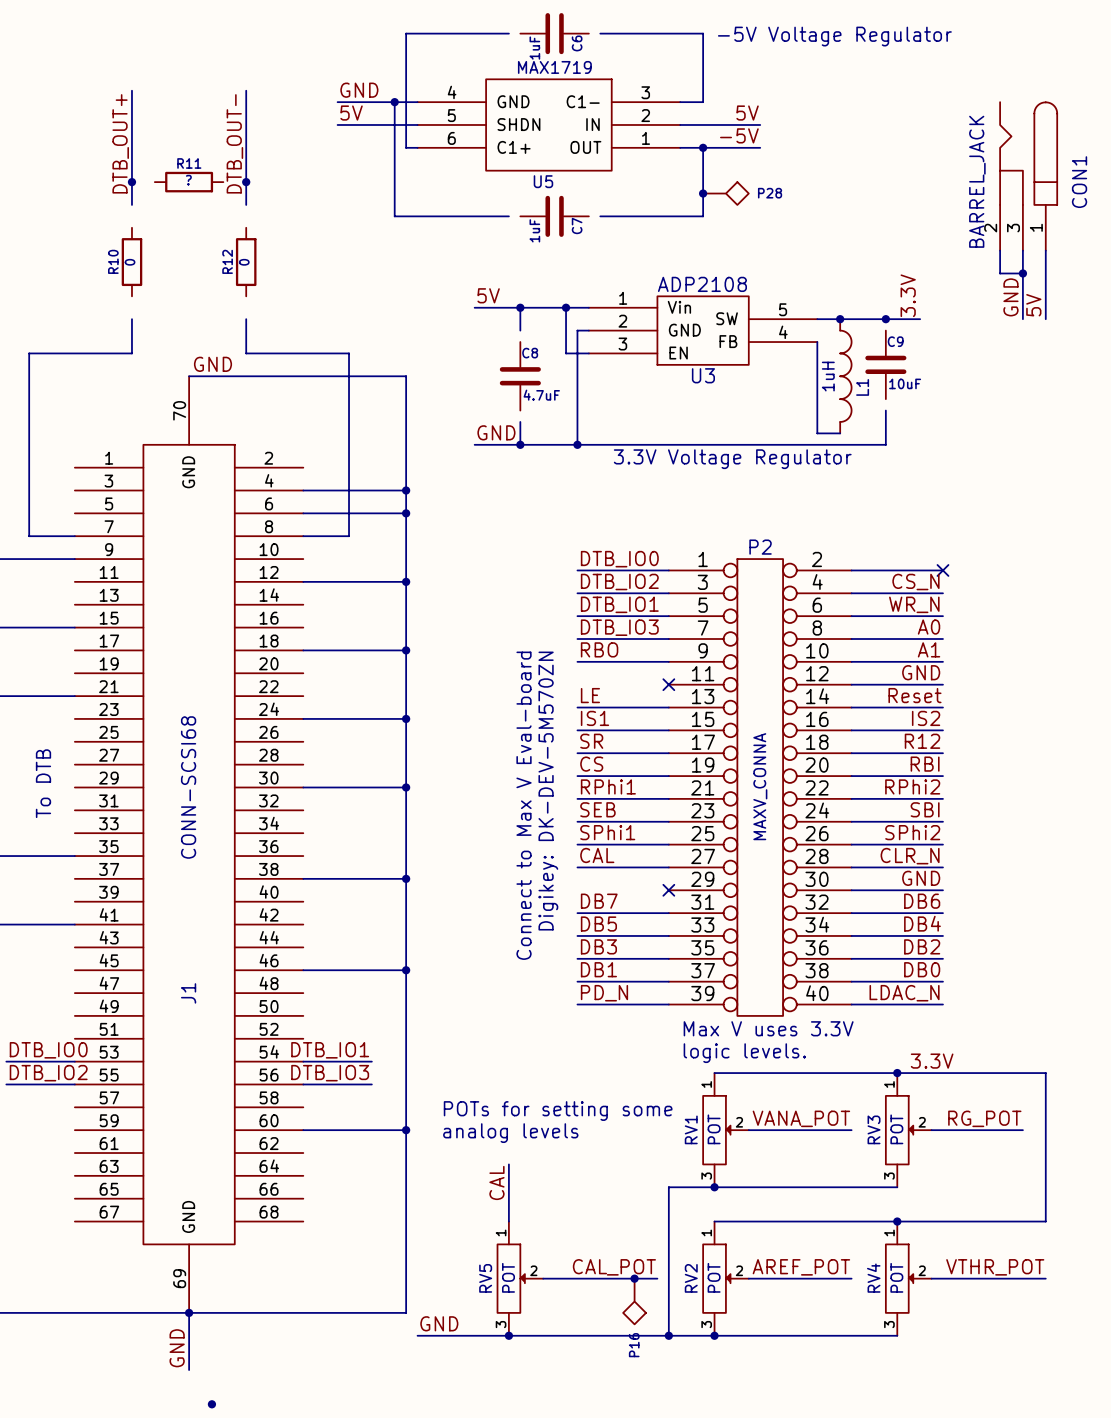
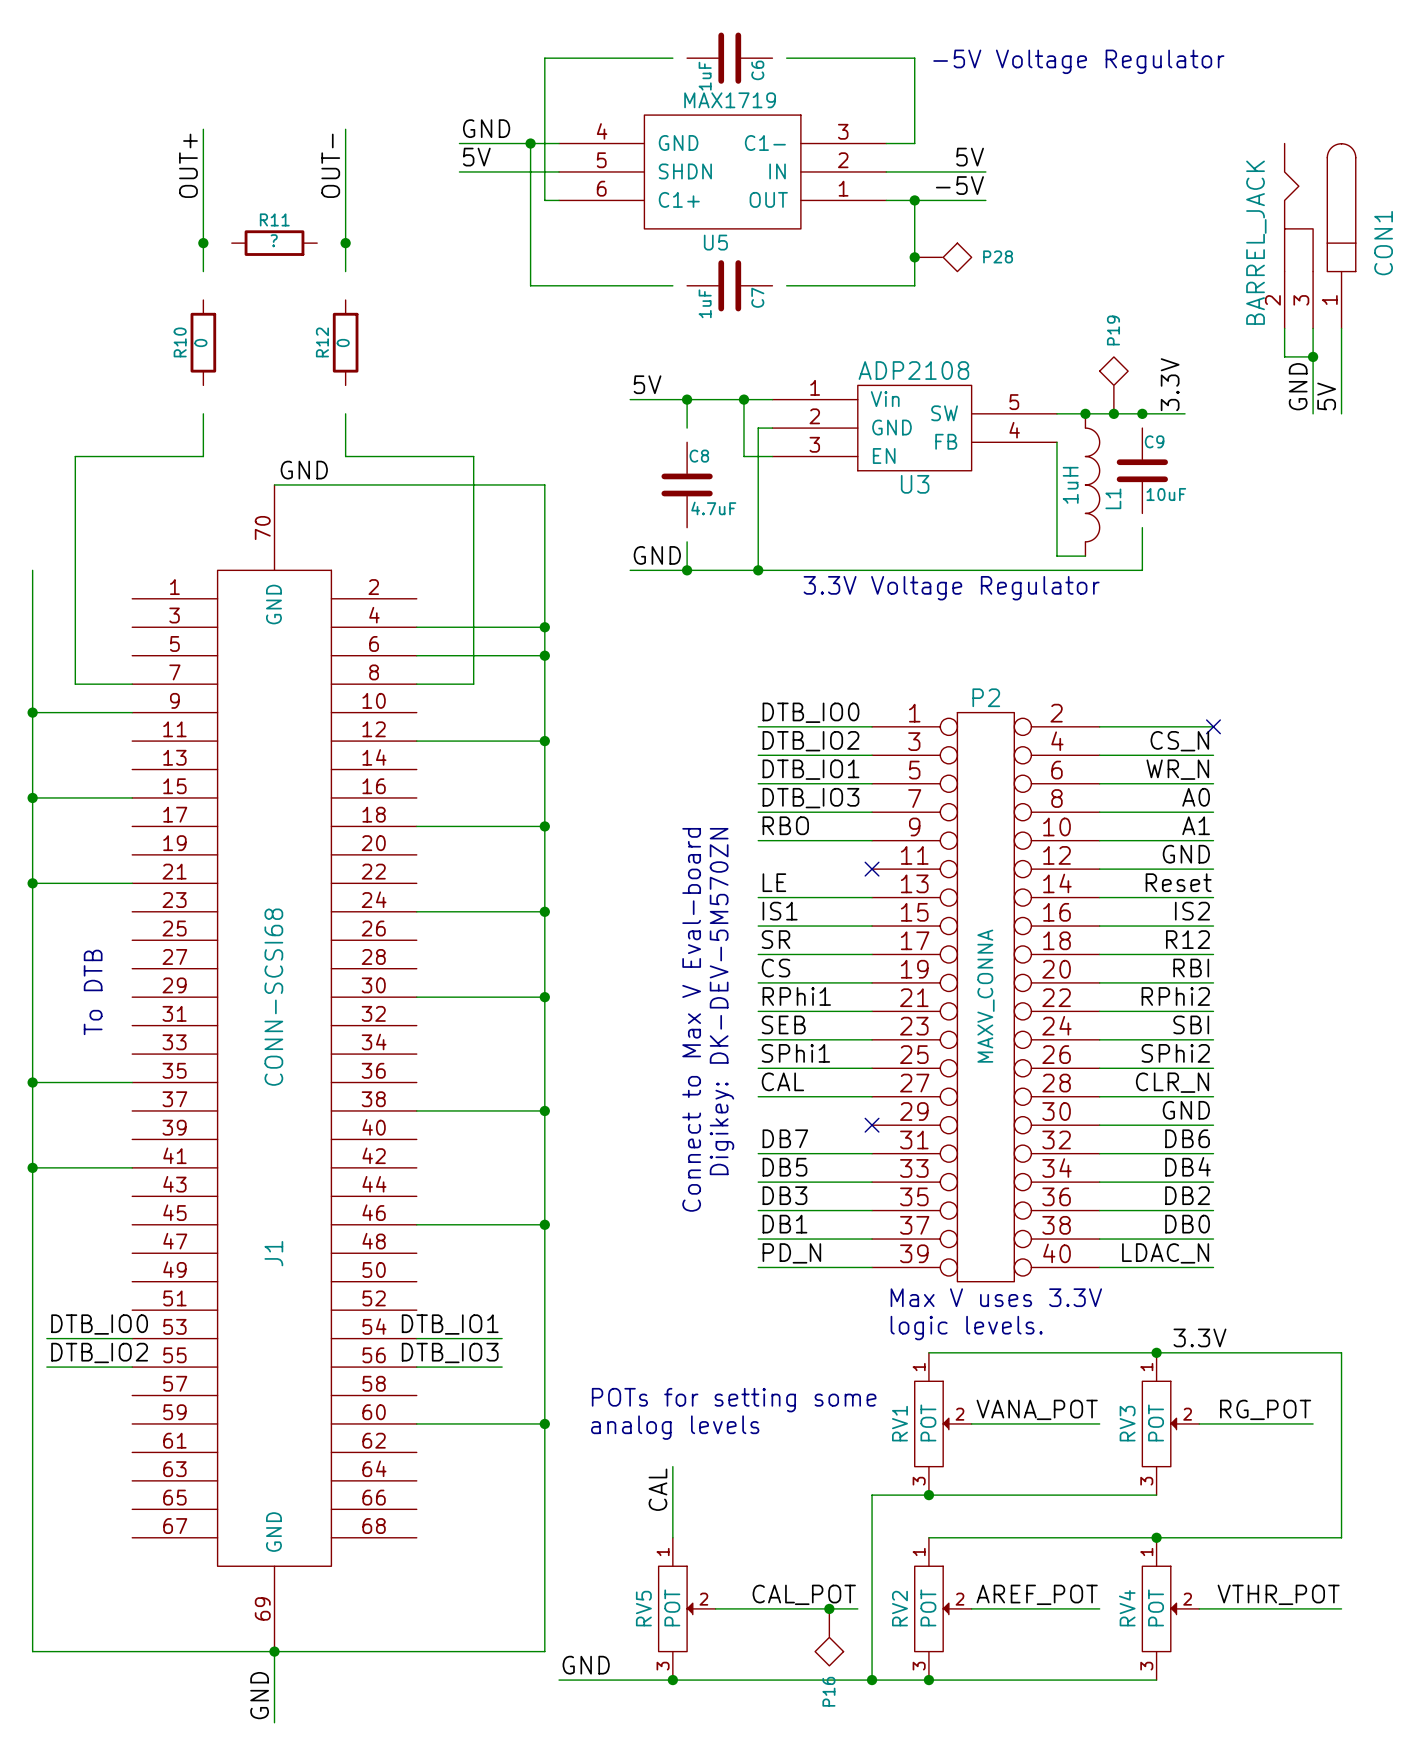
label: DTB_OUT+ (120, 143) -> OUT+ (188, 165)
label: DTB_OUT- (234, 143) -> OUT- (330, 165)
P19: none -> (1113, 385)
junction: none -> (1113, 413)

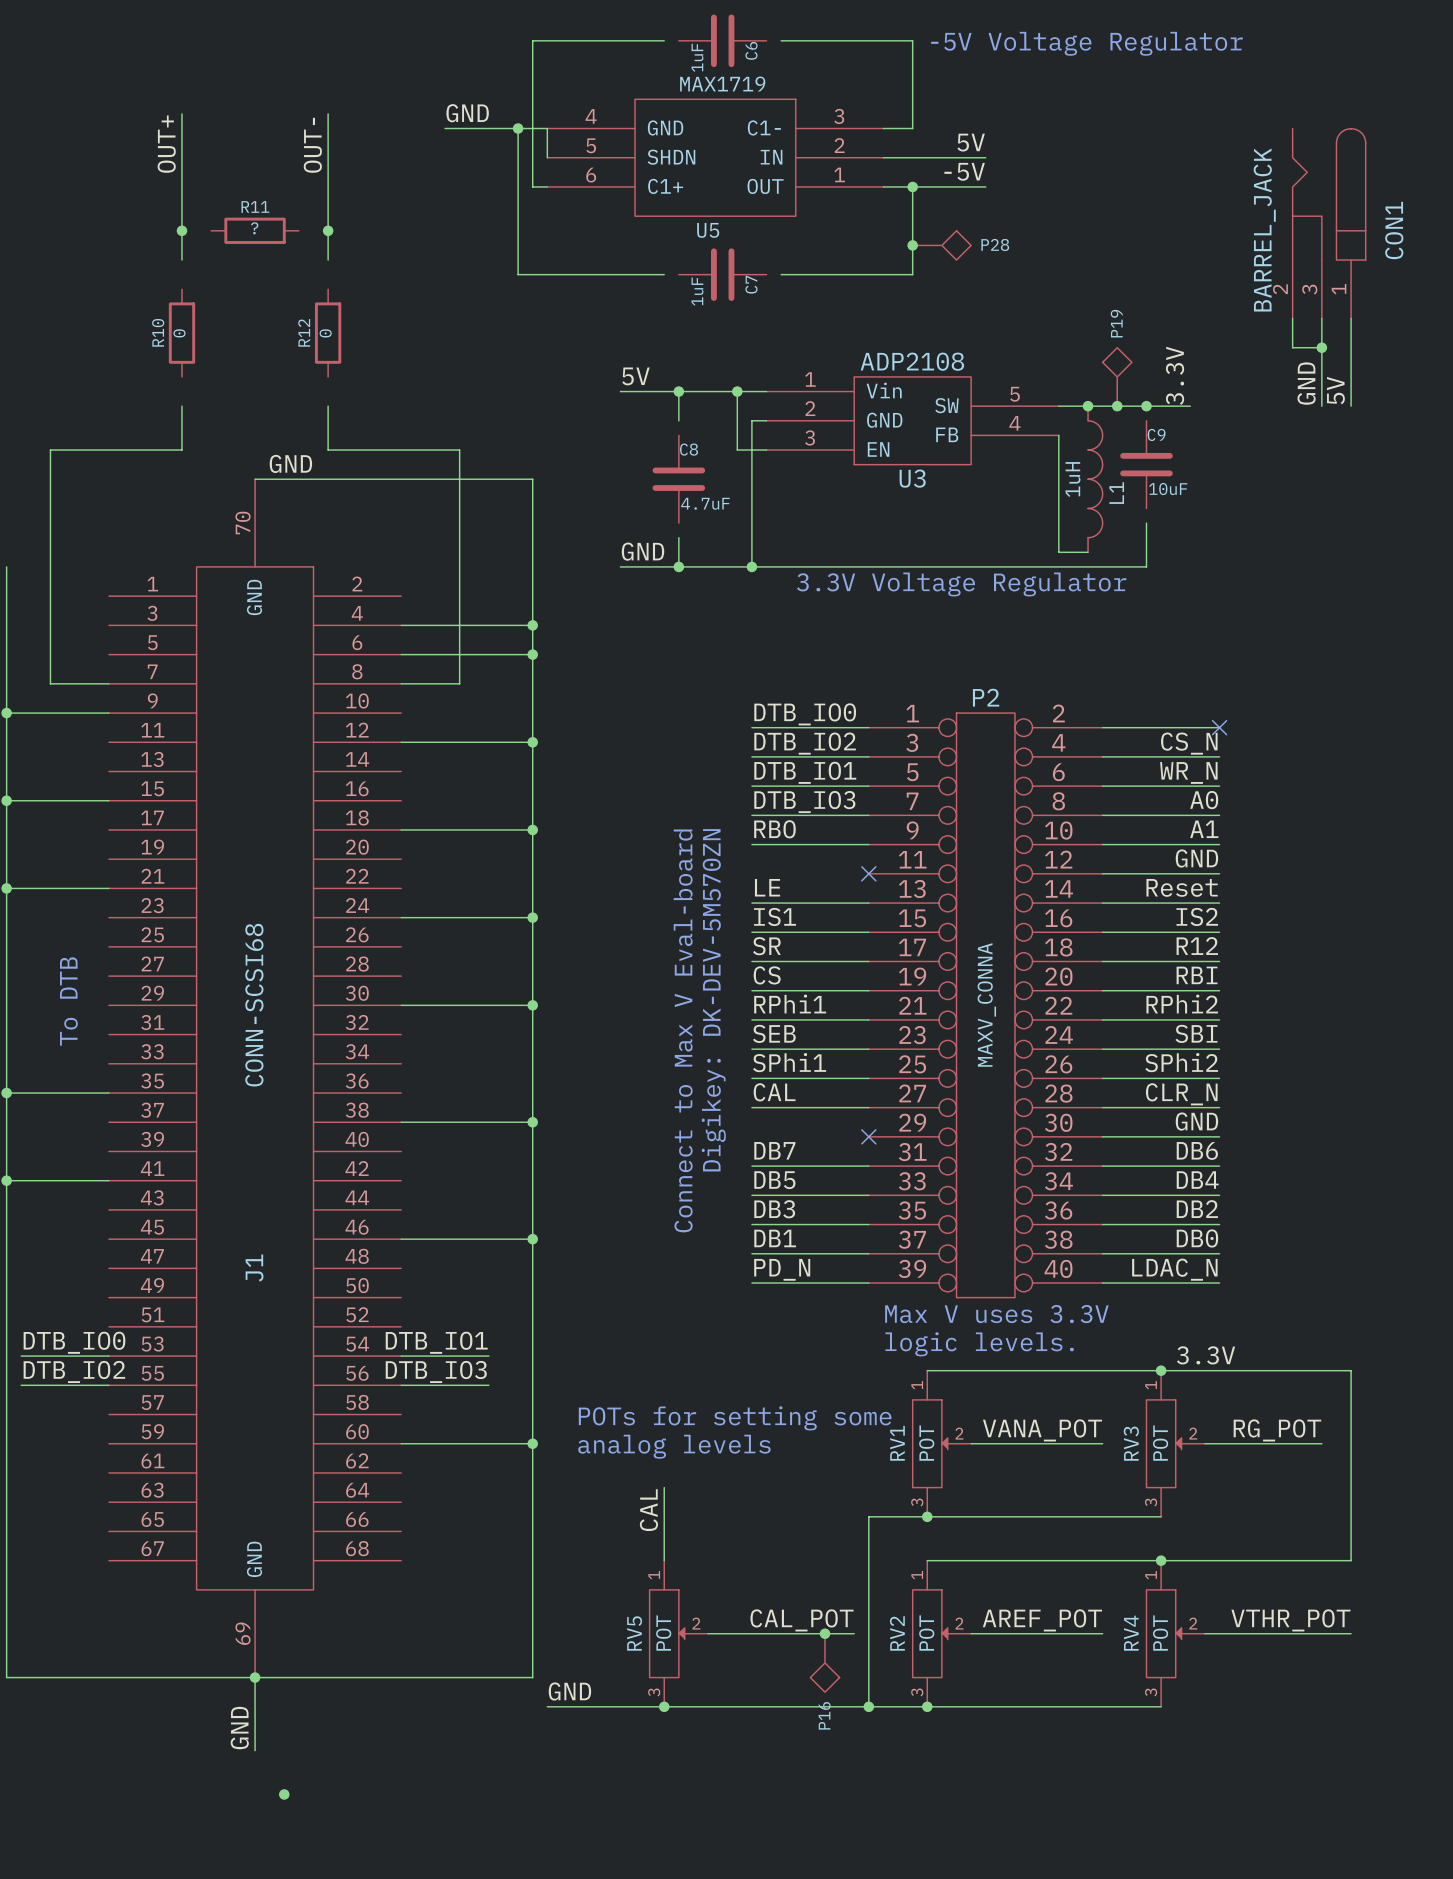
label: 5V (476, 157) -> none
wire: (459, 171) (559, 171) -> (547, 128) (547, 157)

